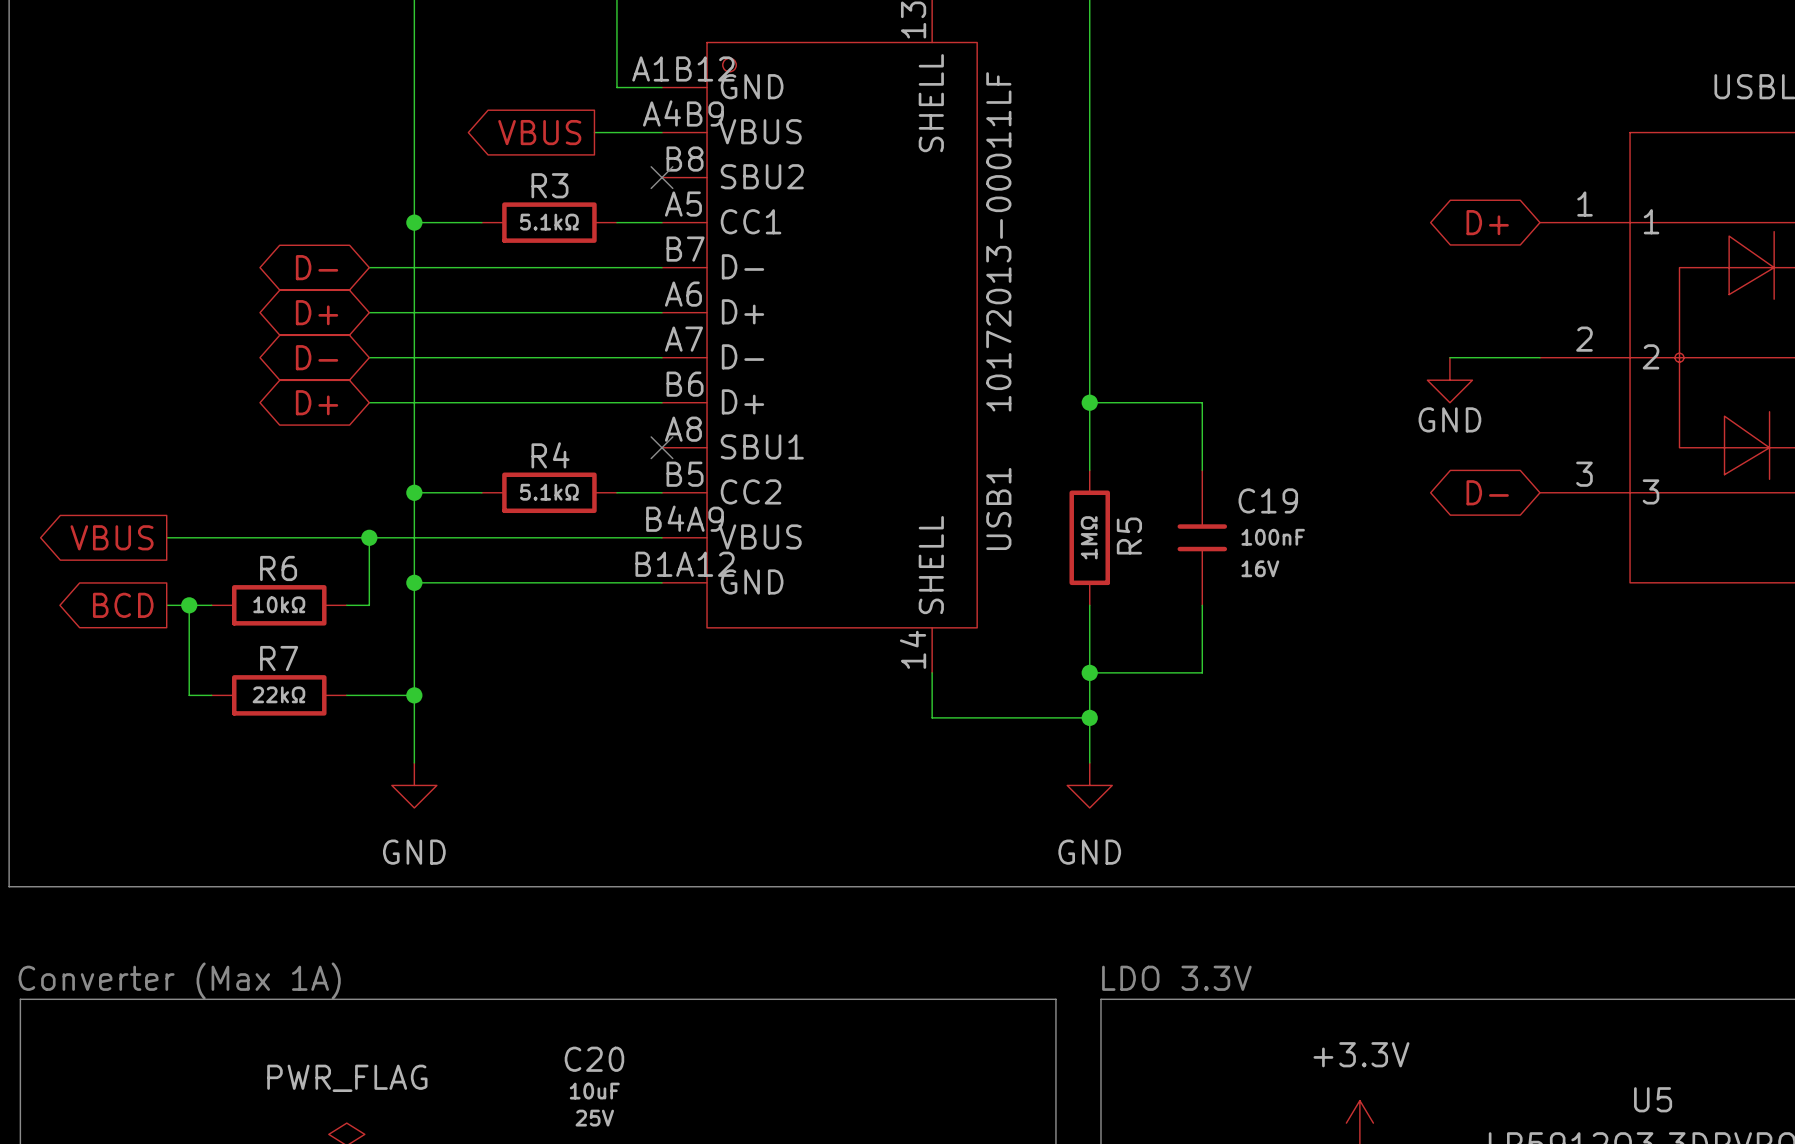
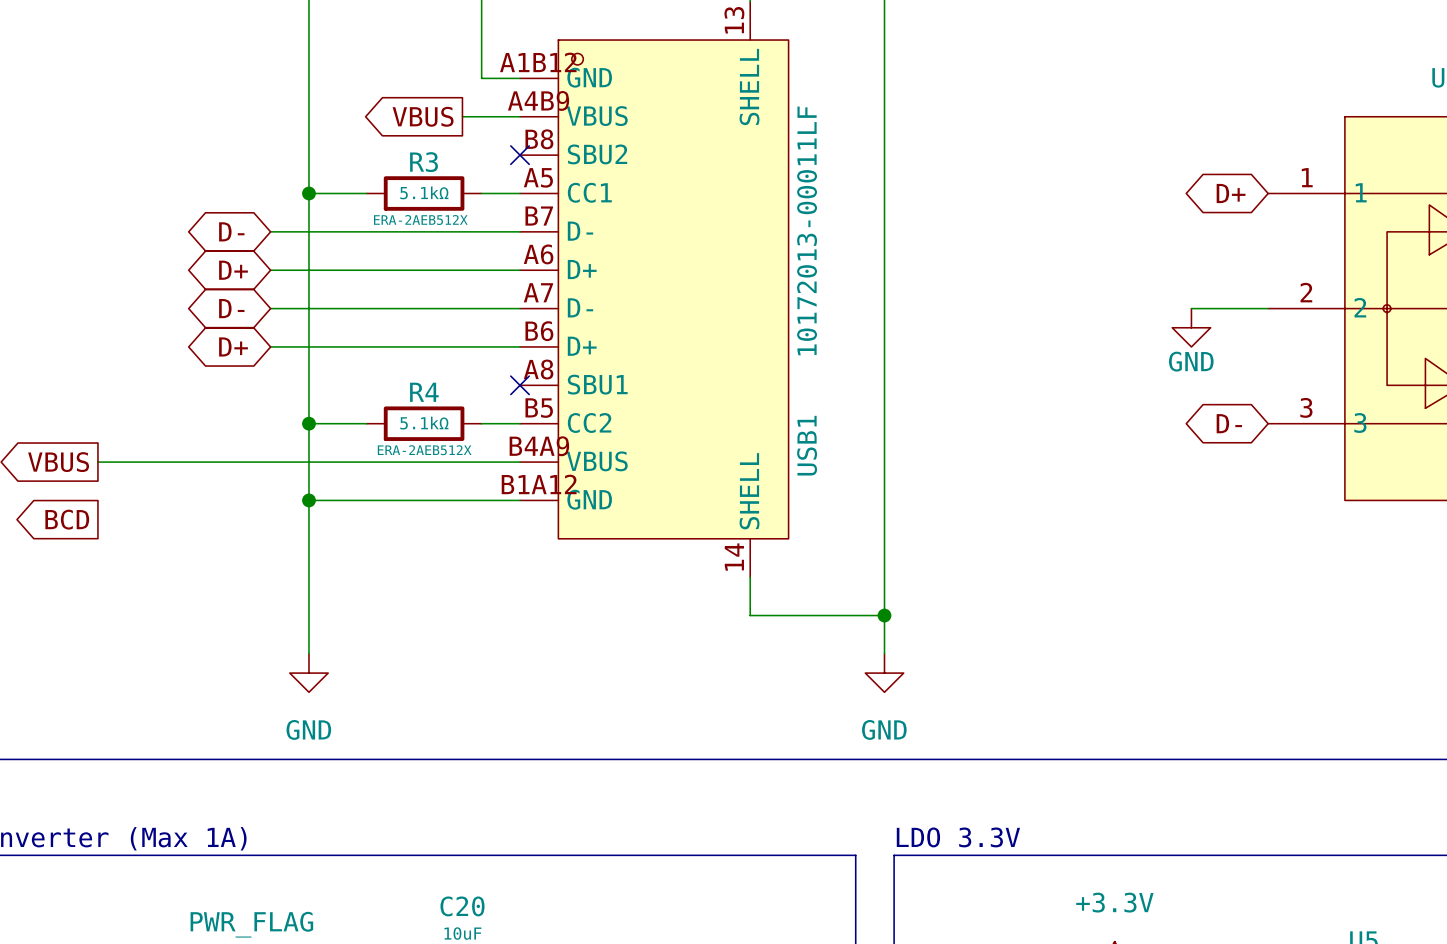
R3 text: none -> ERA-2AEB512X (420, 220)
wire: (1089, 402) (1202, 402) (1202, 470) -> none
junction: (1089, 402) -> none
wire: none -> (884, 404) (884, 519)
R4 text: none -> ERA-2AEB512X (424, 450)
wire: (369, 537) (369, 605) (346, 605) -> none
junction: (369, 537) -> none
R5: 1MΩ (1089, 537) -> none
C19: 100nF (1202, 537) -> none
wire: (166, 605) (211, 605) -> none
wire: (189, 605) (189, 695) (211, 695) -> none
junction: (189, 605) -> none
R6: 10kΩ (279, 605) -> none
wire: (1202, 605) (1202, 672) (1089, 672) -> none
junction: (1089, 672) -> none
R7: 22kΩ (279, 695) -> none
wire: (346, 695) (414, 695) -> none
junction: (414, 695) -> none

